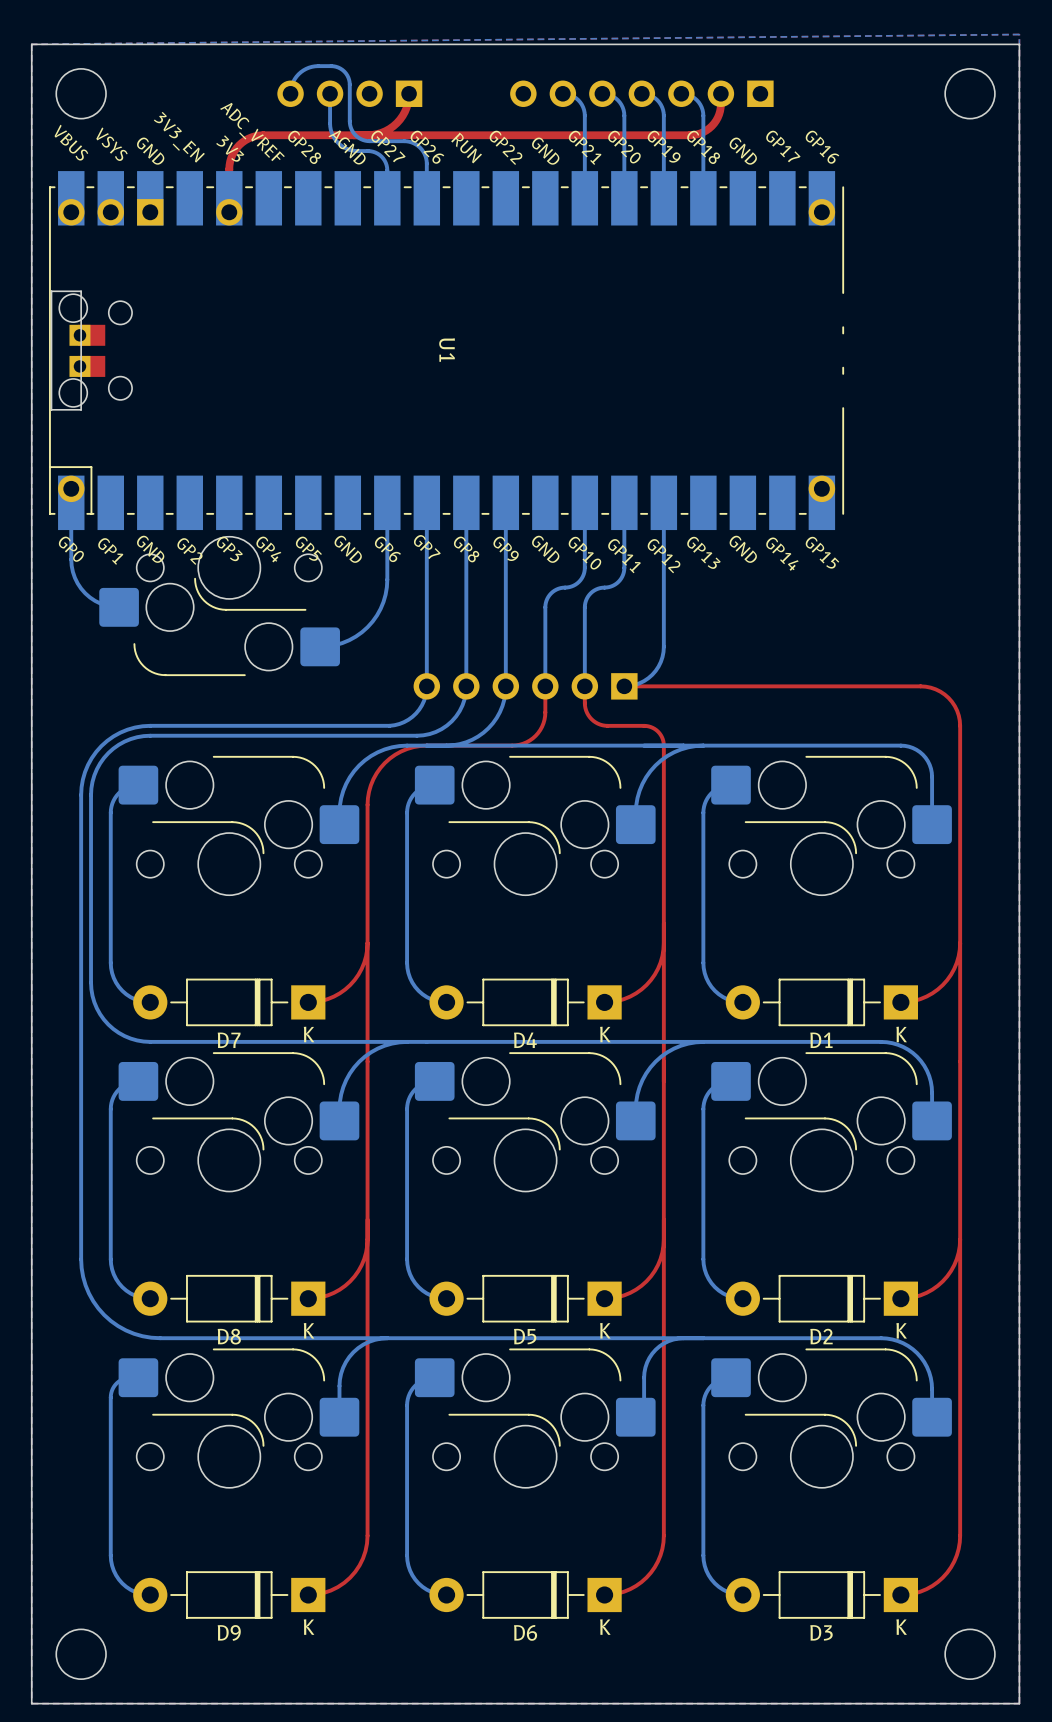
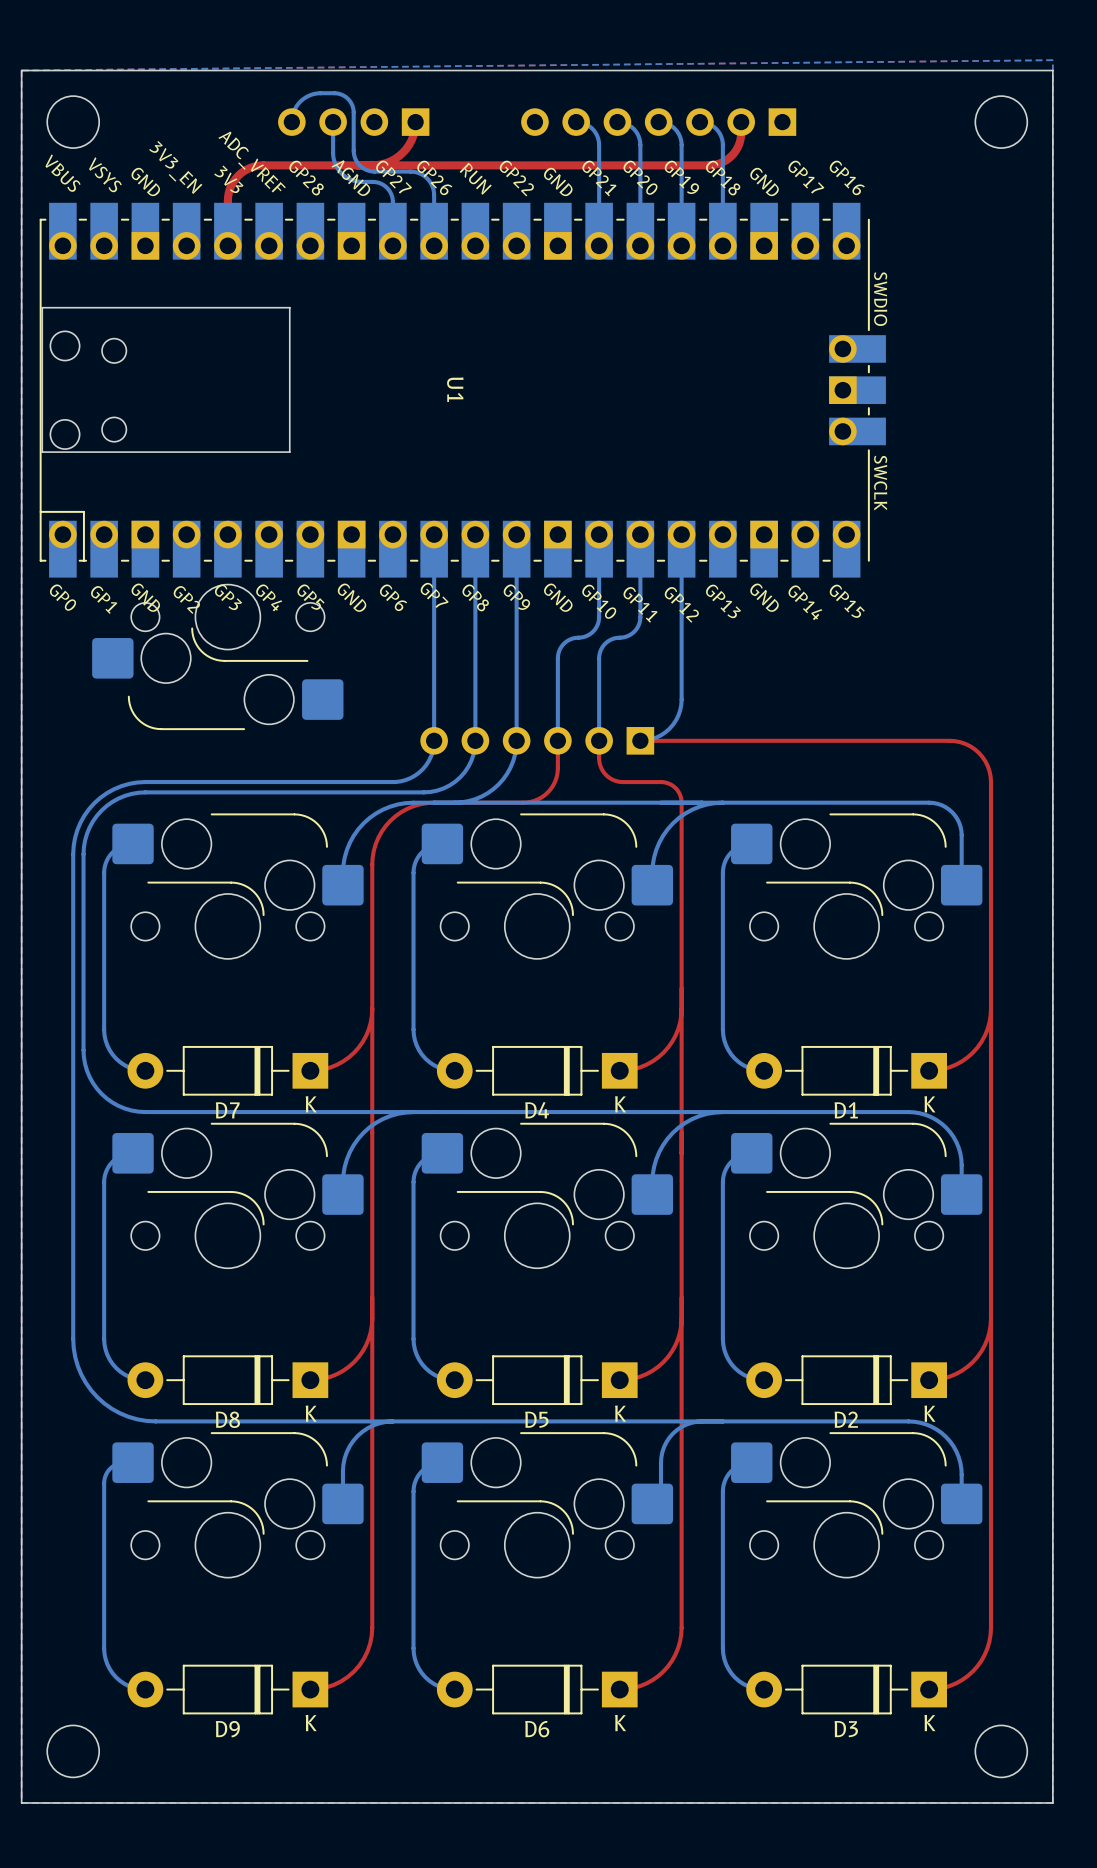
U1 footprint: [49, 171, 845, 531] -> [39, 202, 886, 578]
board edge: (51, 291) (81, 291) (81, 409) -> (42, 328) (42, 307) (289, 307) (289, 452) (73, 452)
part: (87, 350) -> none
bottom track: (71, 488) (71, 559) (74, 577) (81, 588) (89, 597) (100, 603) (119, 607) -> none
bottom track: (387, 488) (387, 579) (385, 594) (380, 608) (372, 621) (355, 636) (335, 645) (320, 646) -> none

